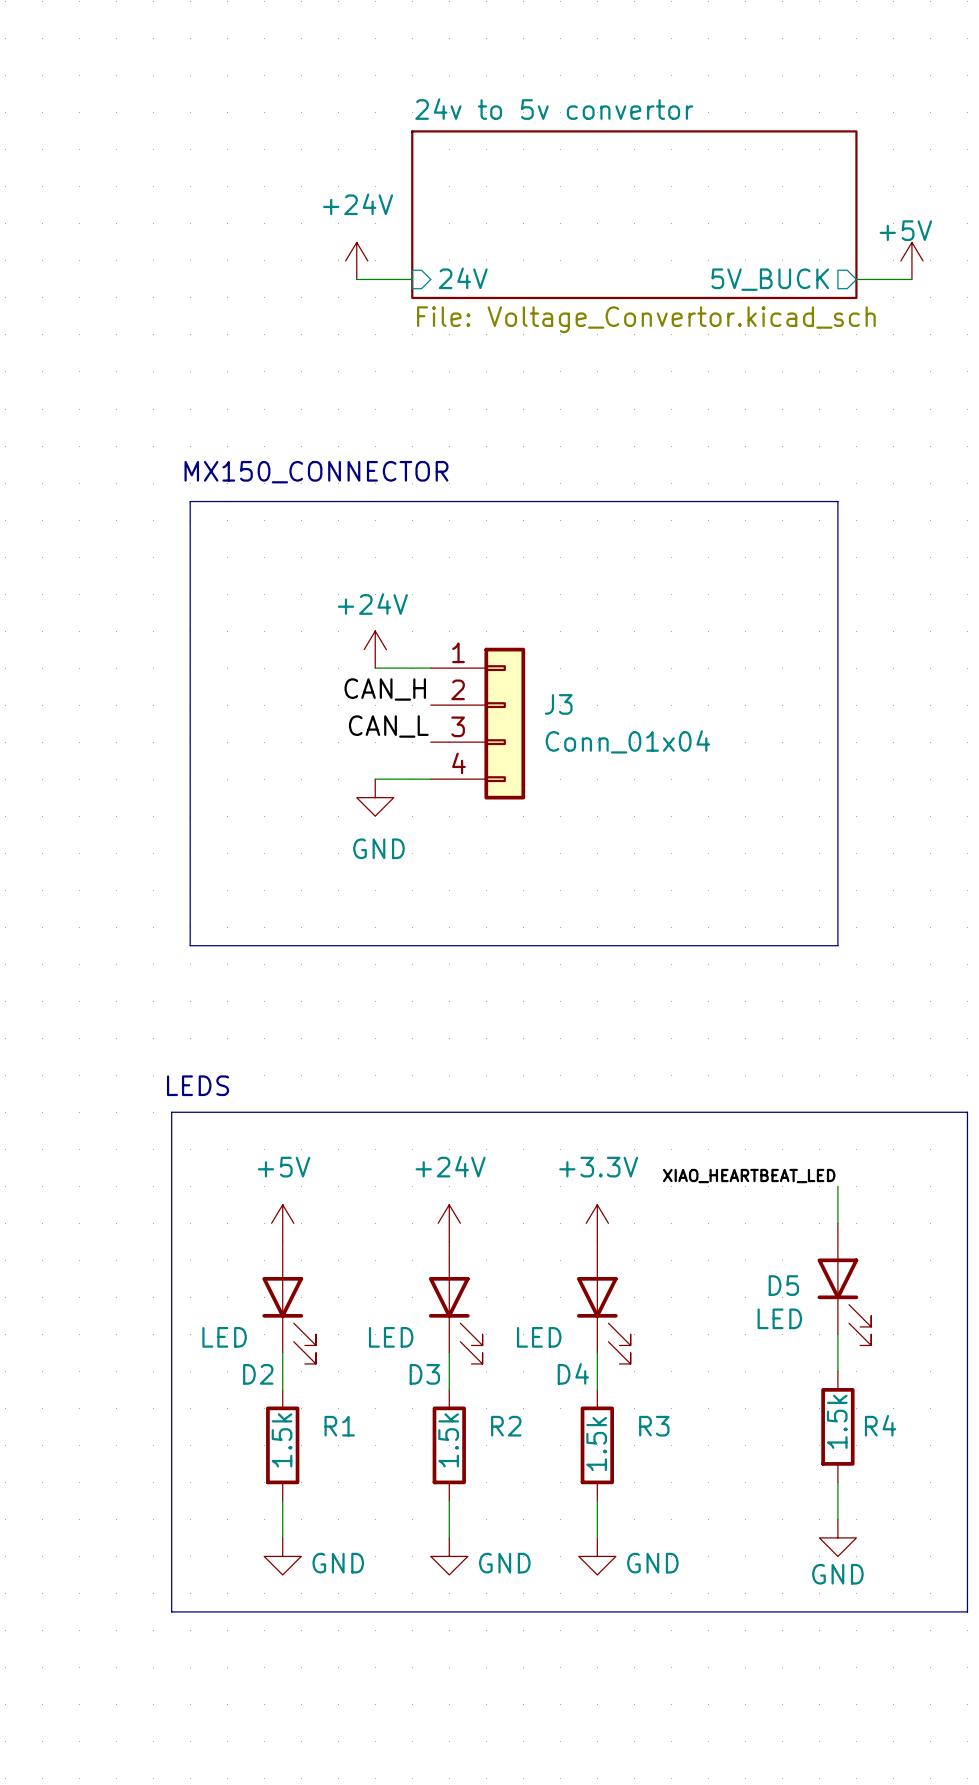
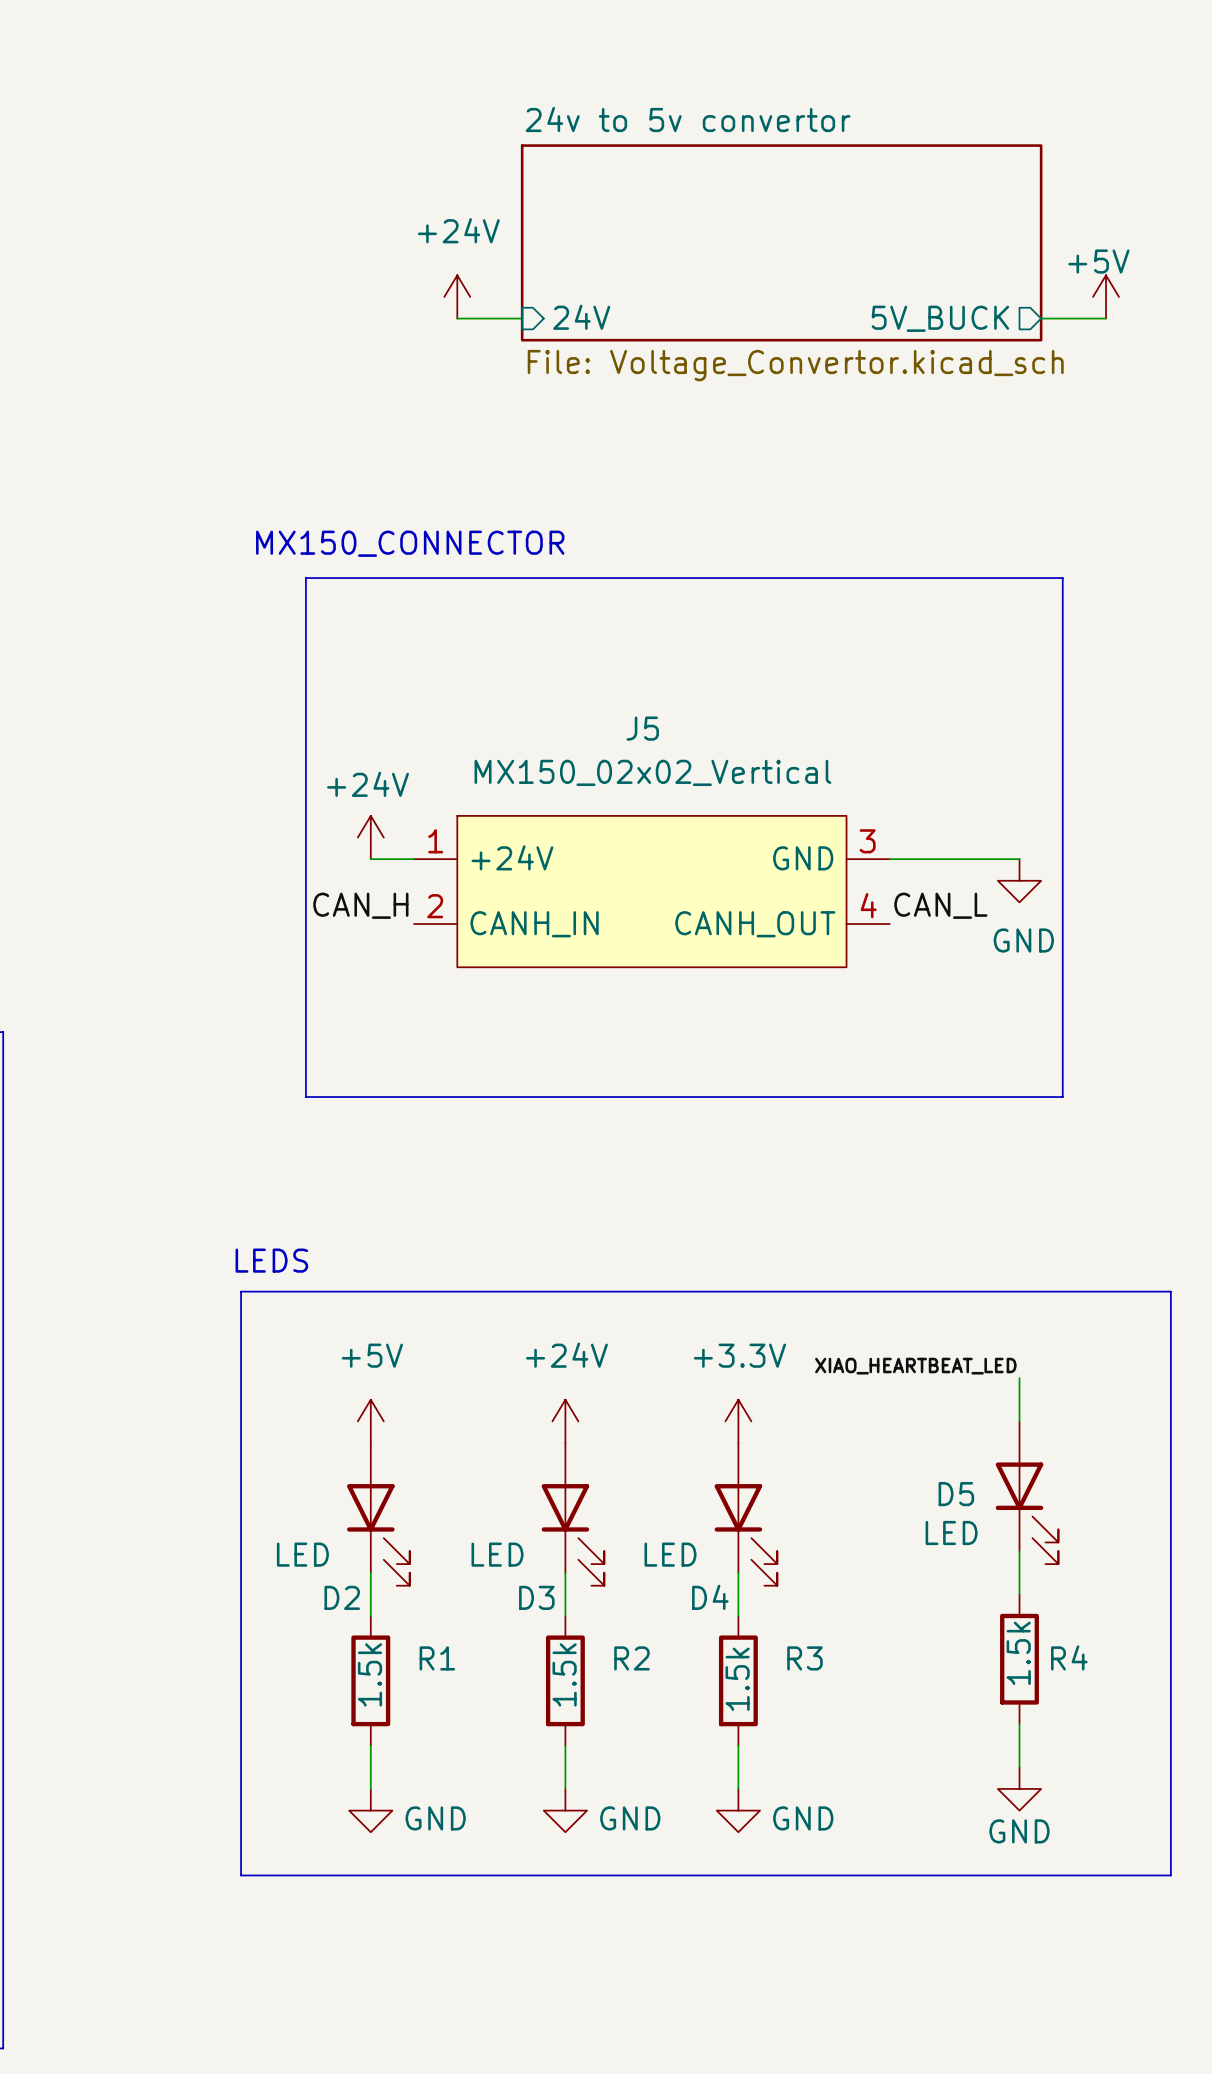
line: (227, 501) (190, 501) (190, 945) (227, 945) -> (305, 578) (305, 1097)
line: (837, 501) (837, 945) -> (1019, 578) (1062, 578) (1062, 1097) (1019, 1097)
power symbol position: +24V (375, 649) -> +24V (370, 837)
wire: (375, 668) (430, 668) -> none
label position: CAN_H (385, 689) -> CAN_H (360, 905)
J3: Conn_01x04 (477, 723) -> none
label position: CAN_L (388, 726) -> CAN_L (940, 905)
wire: none -> (370, 859) (414, 859)
wire: none -> (889, 859) (1019, 859)
power symbol: none -> GND (1019, 880)
J5: none -> MX150_02x02_Vertical (651, 891)
power symbol: GND (375, 797) -> none

